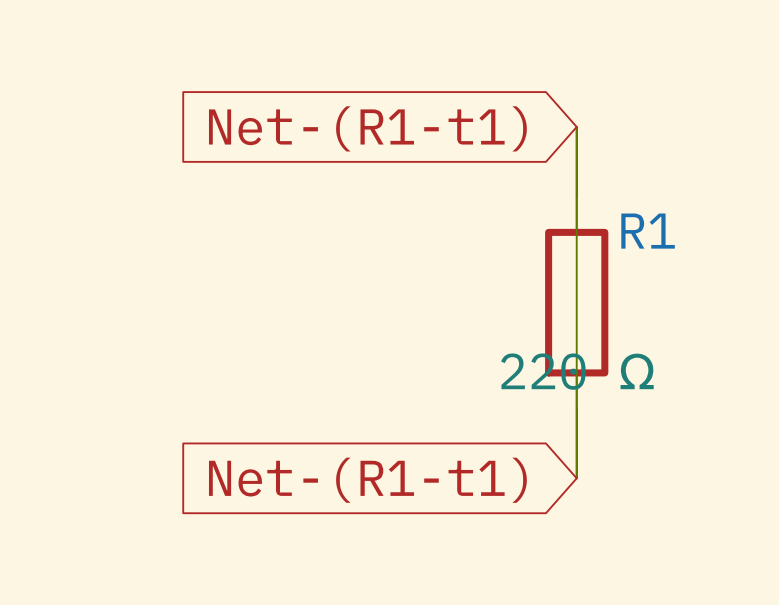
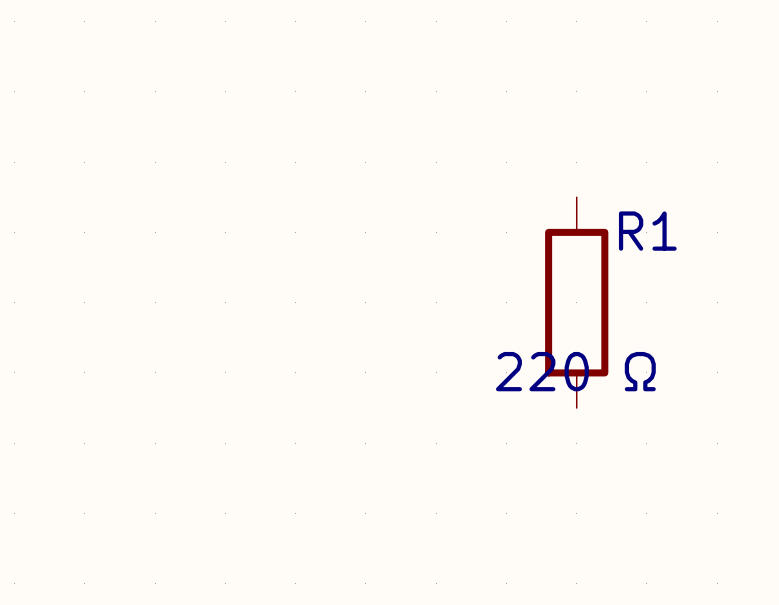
wire: (576, 126) (576, 478) -> none
global label: Net-(R1-t1) (367, 128) -> none
global label: Net-(R1-t1) (367, 480) -> none

